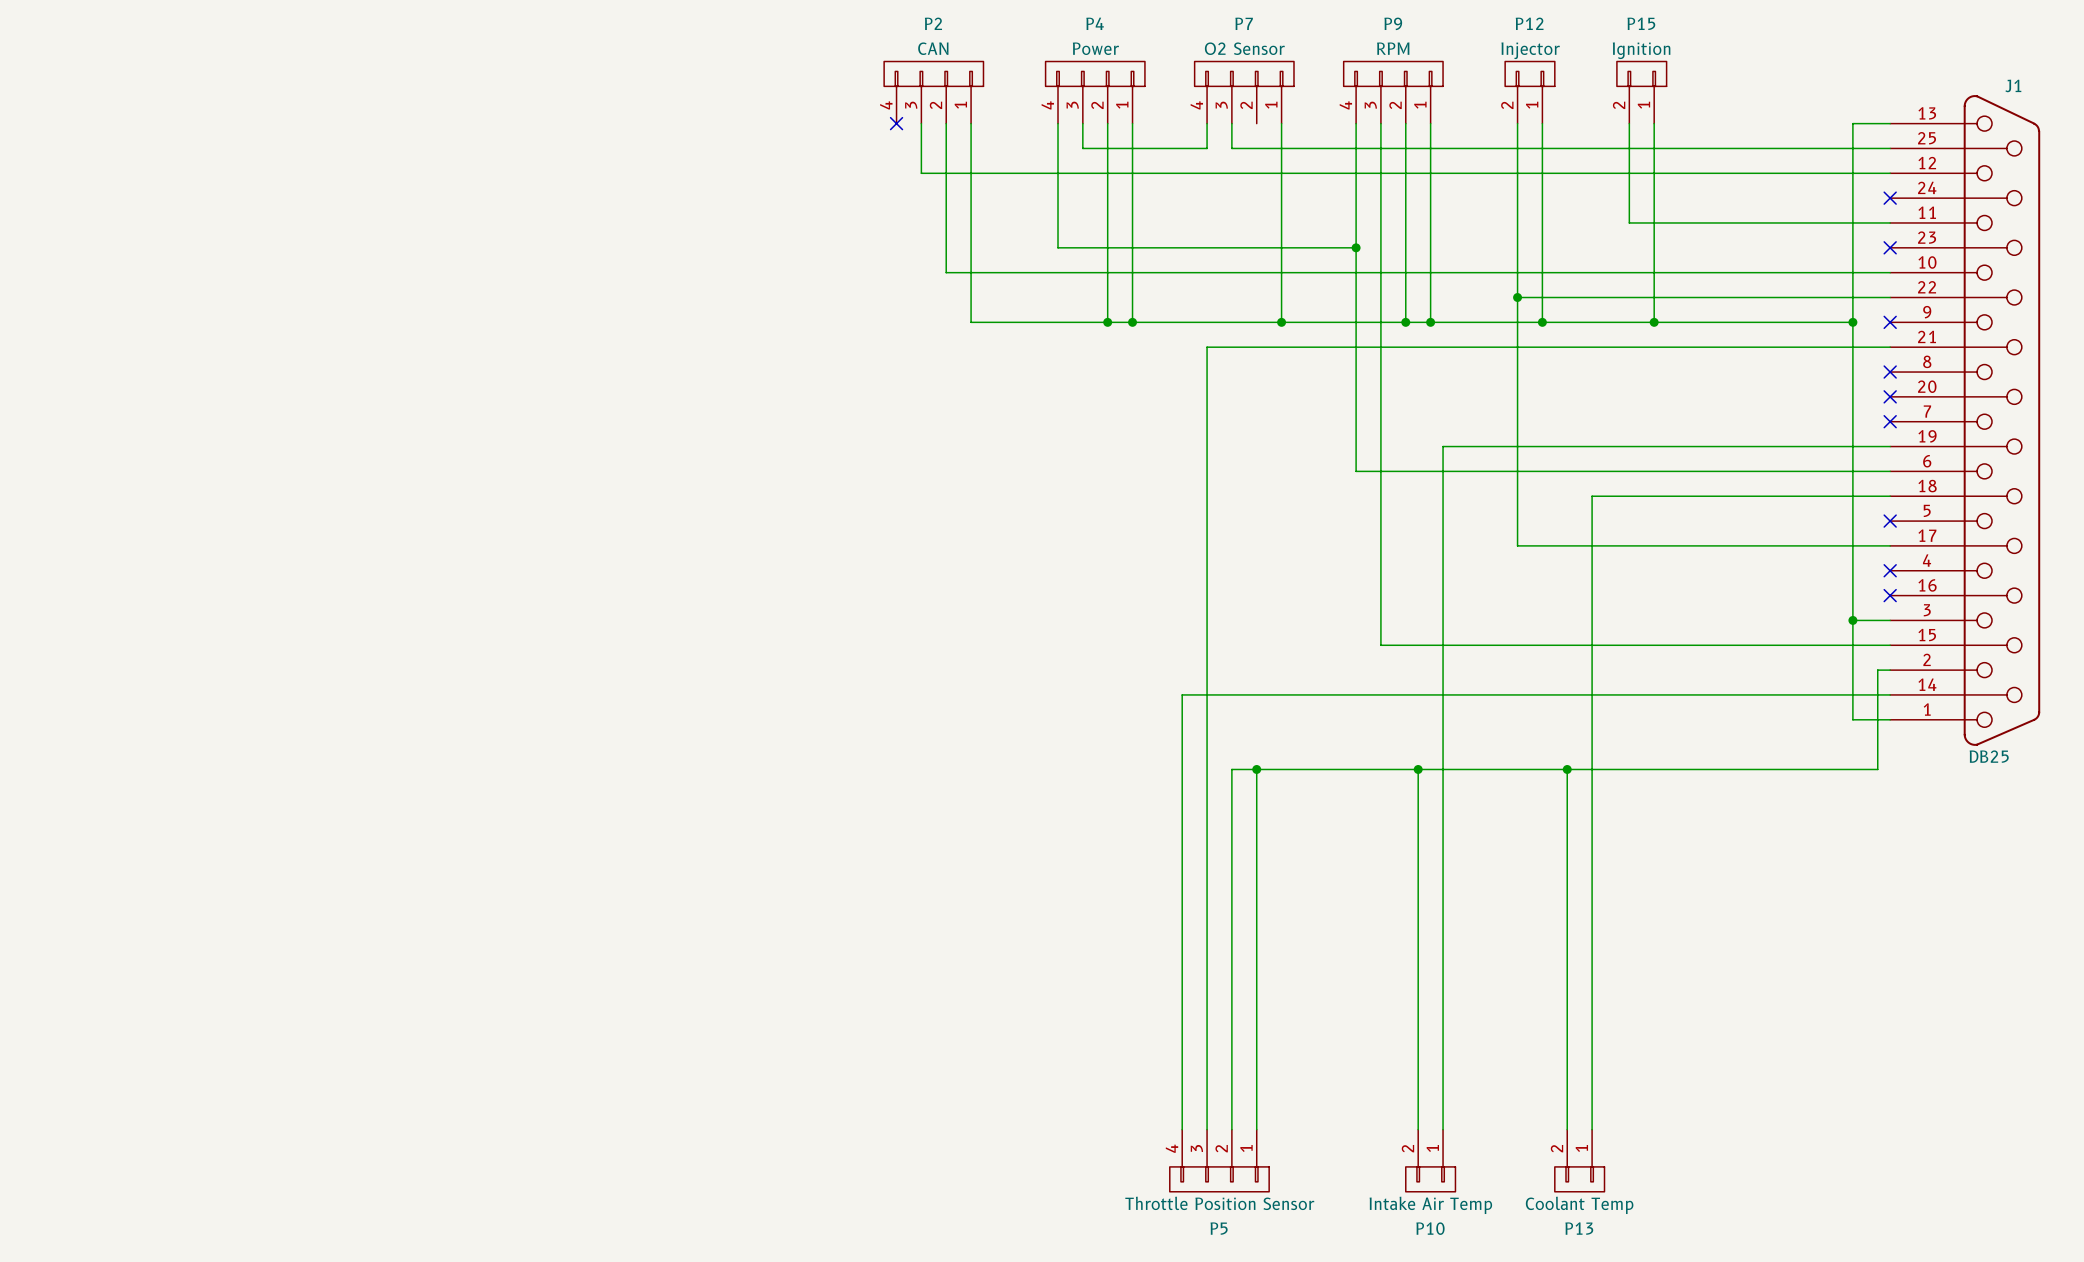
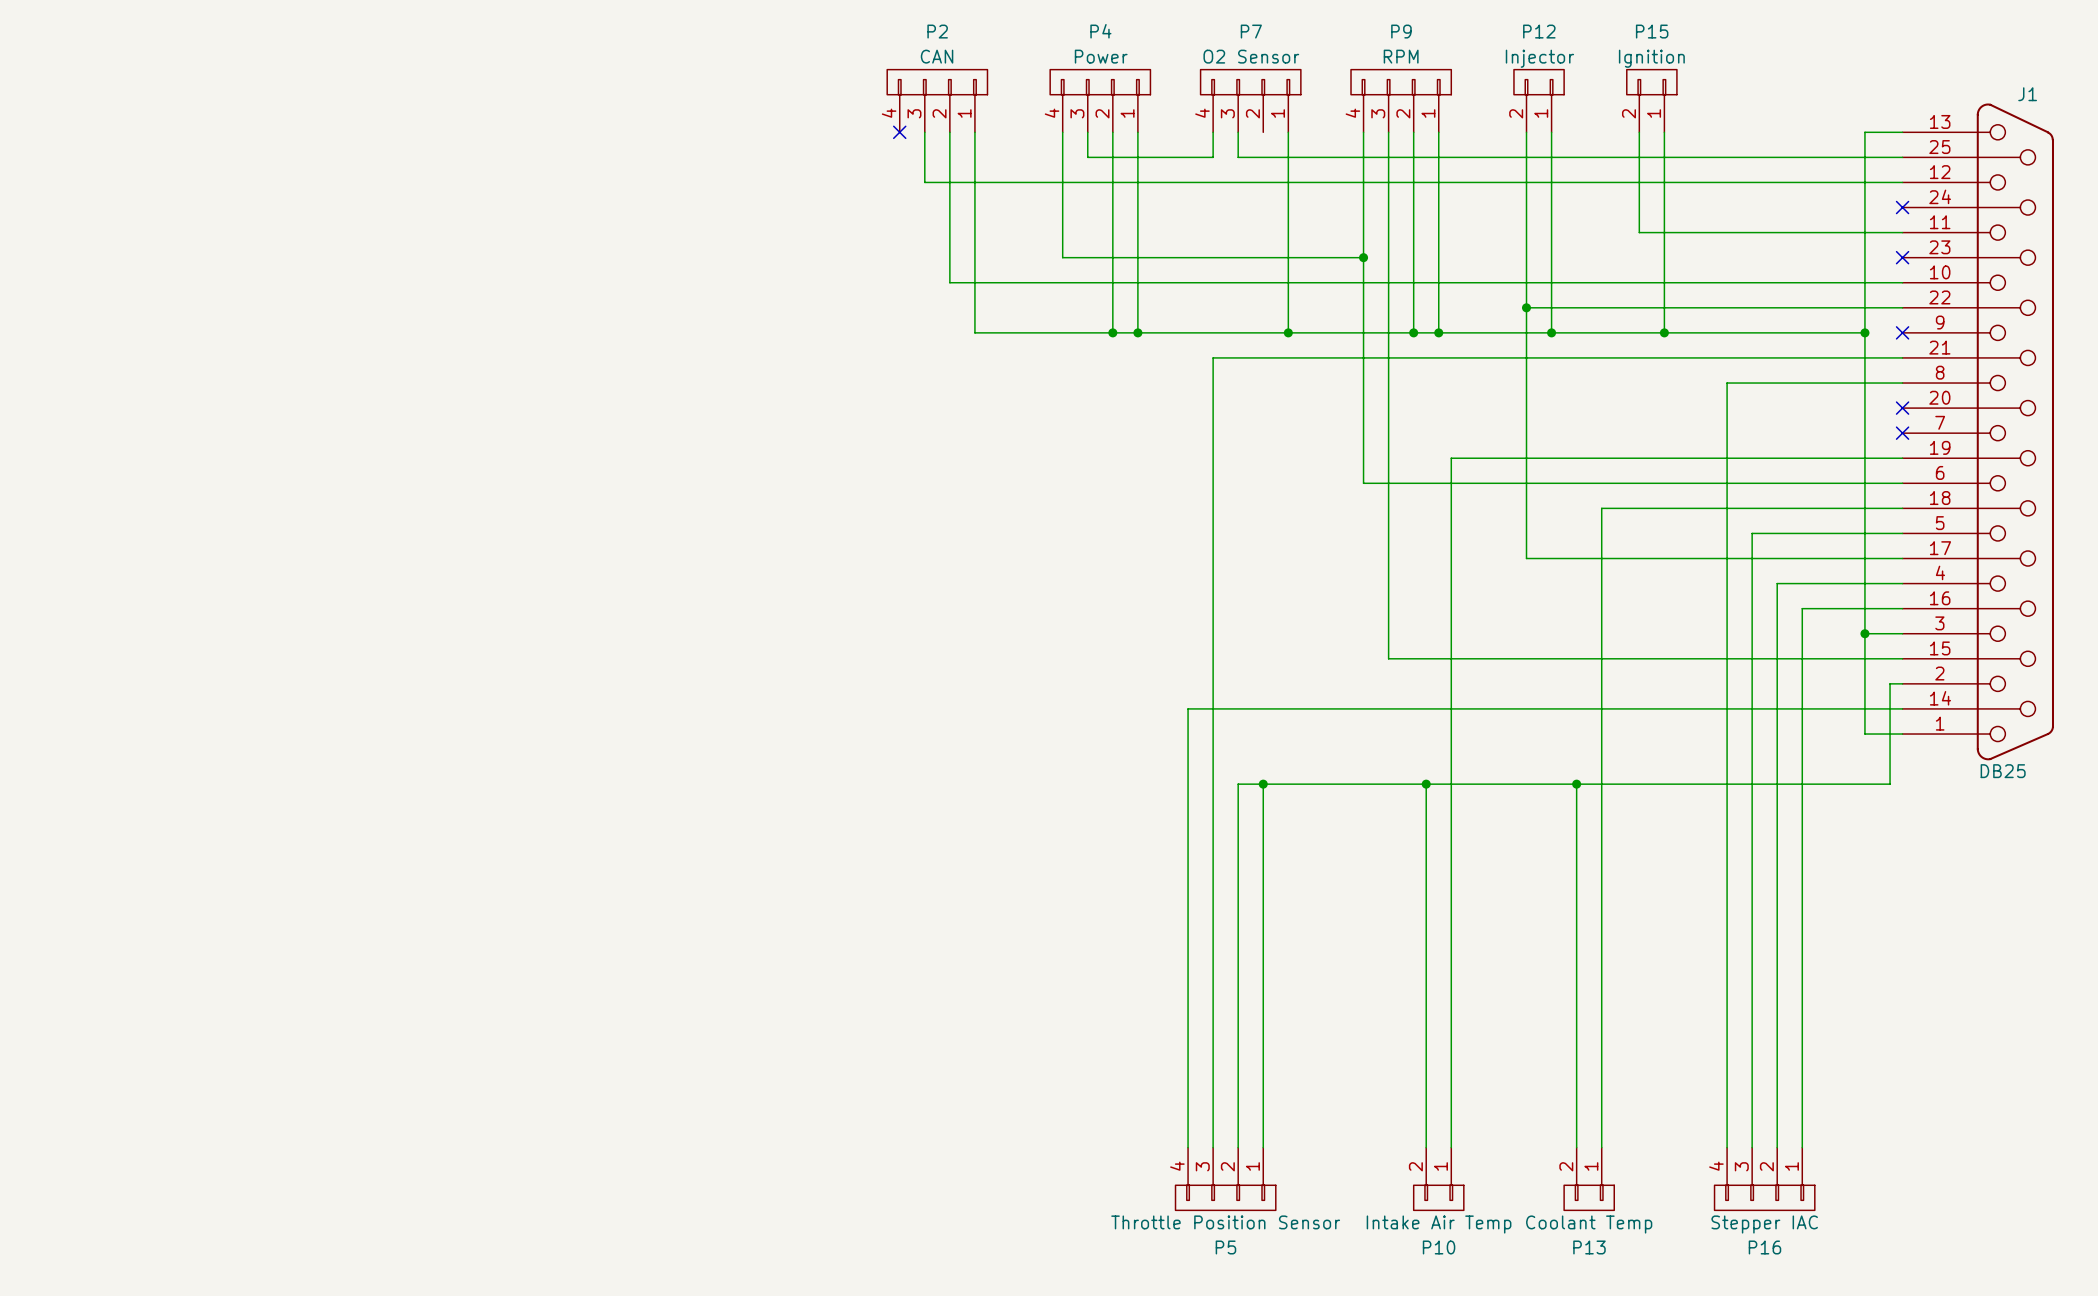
wire: none -> (1902, 383) (1727, 383) (1727, 1147)
no-connect mark: (1890, 372) -> none
wire: none -> (1902, 533) (1752, 533) (1752, 1147)
no-connect mark: (1890, 521) -> none
wire: none -> (1902, 583) (1777, 583) (1777, 1147)
no-connect mark: (1890, 570) -> none
wire: none -> (1902, 608) (1802, 608) (1802, 1147)
no-connect mark: (1890, 595) -> none
P16: none -> Stepper IAC (1764, 1179)

